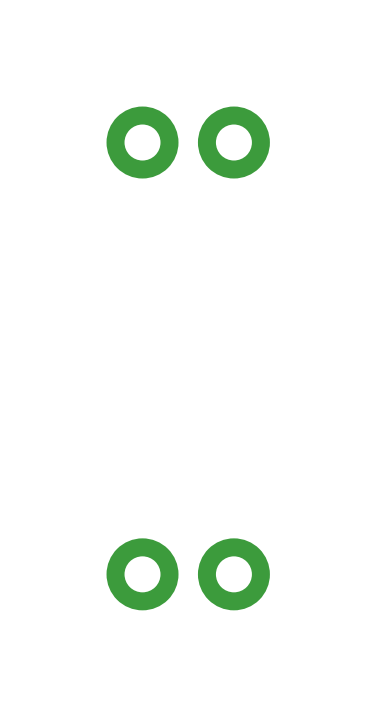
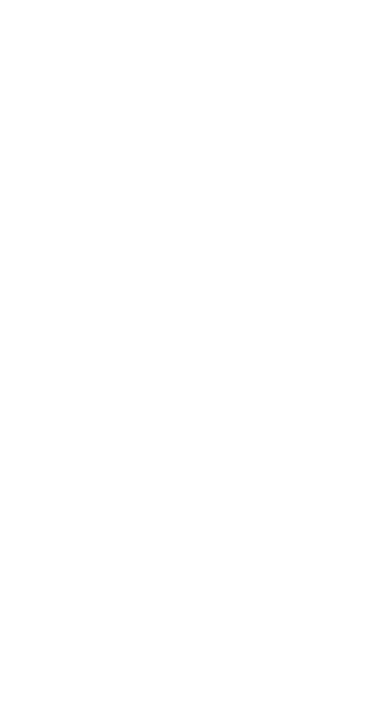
part: (188, 142) -> none
part: (188, 574) -> none

